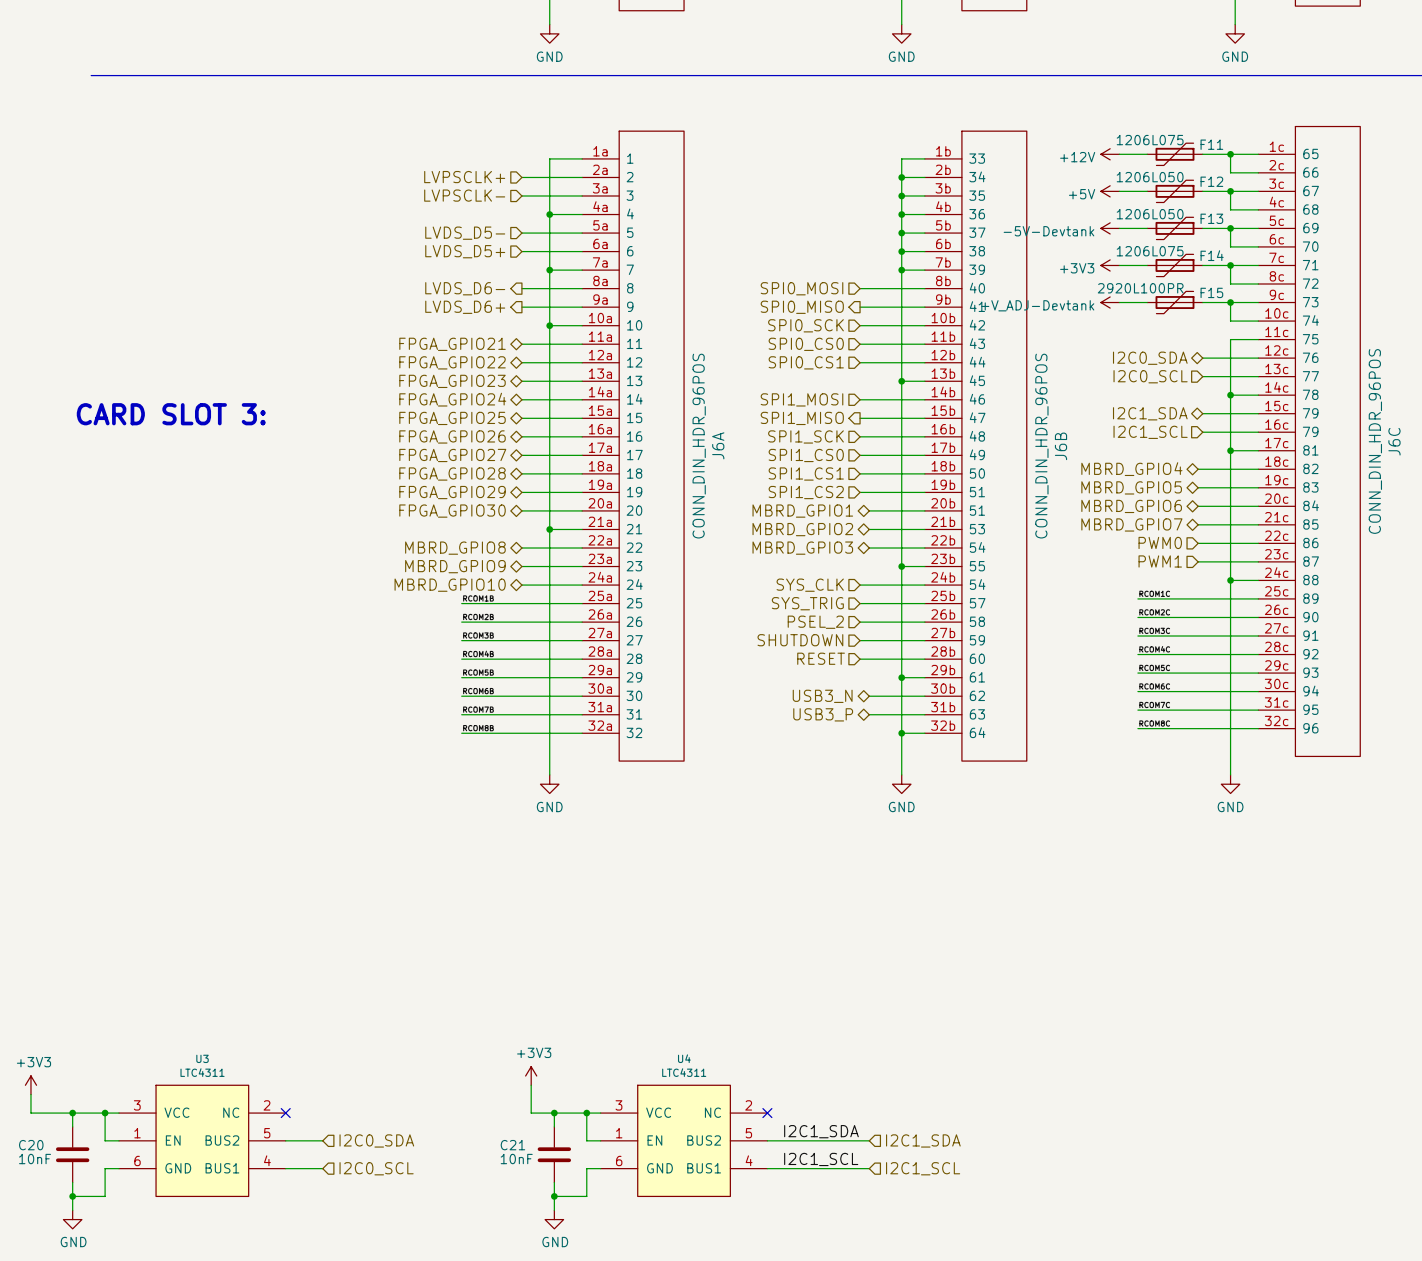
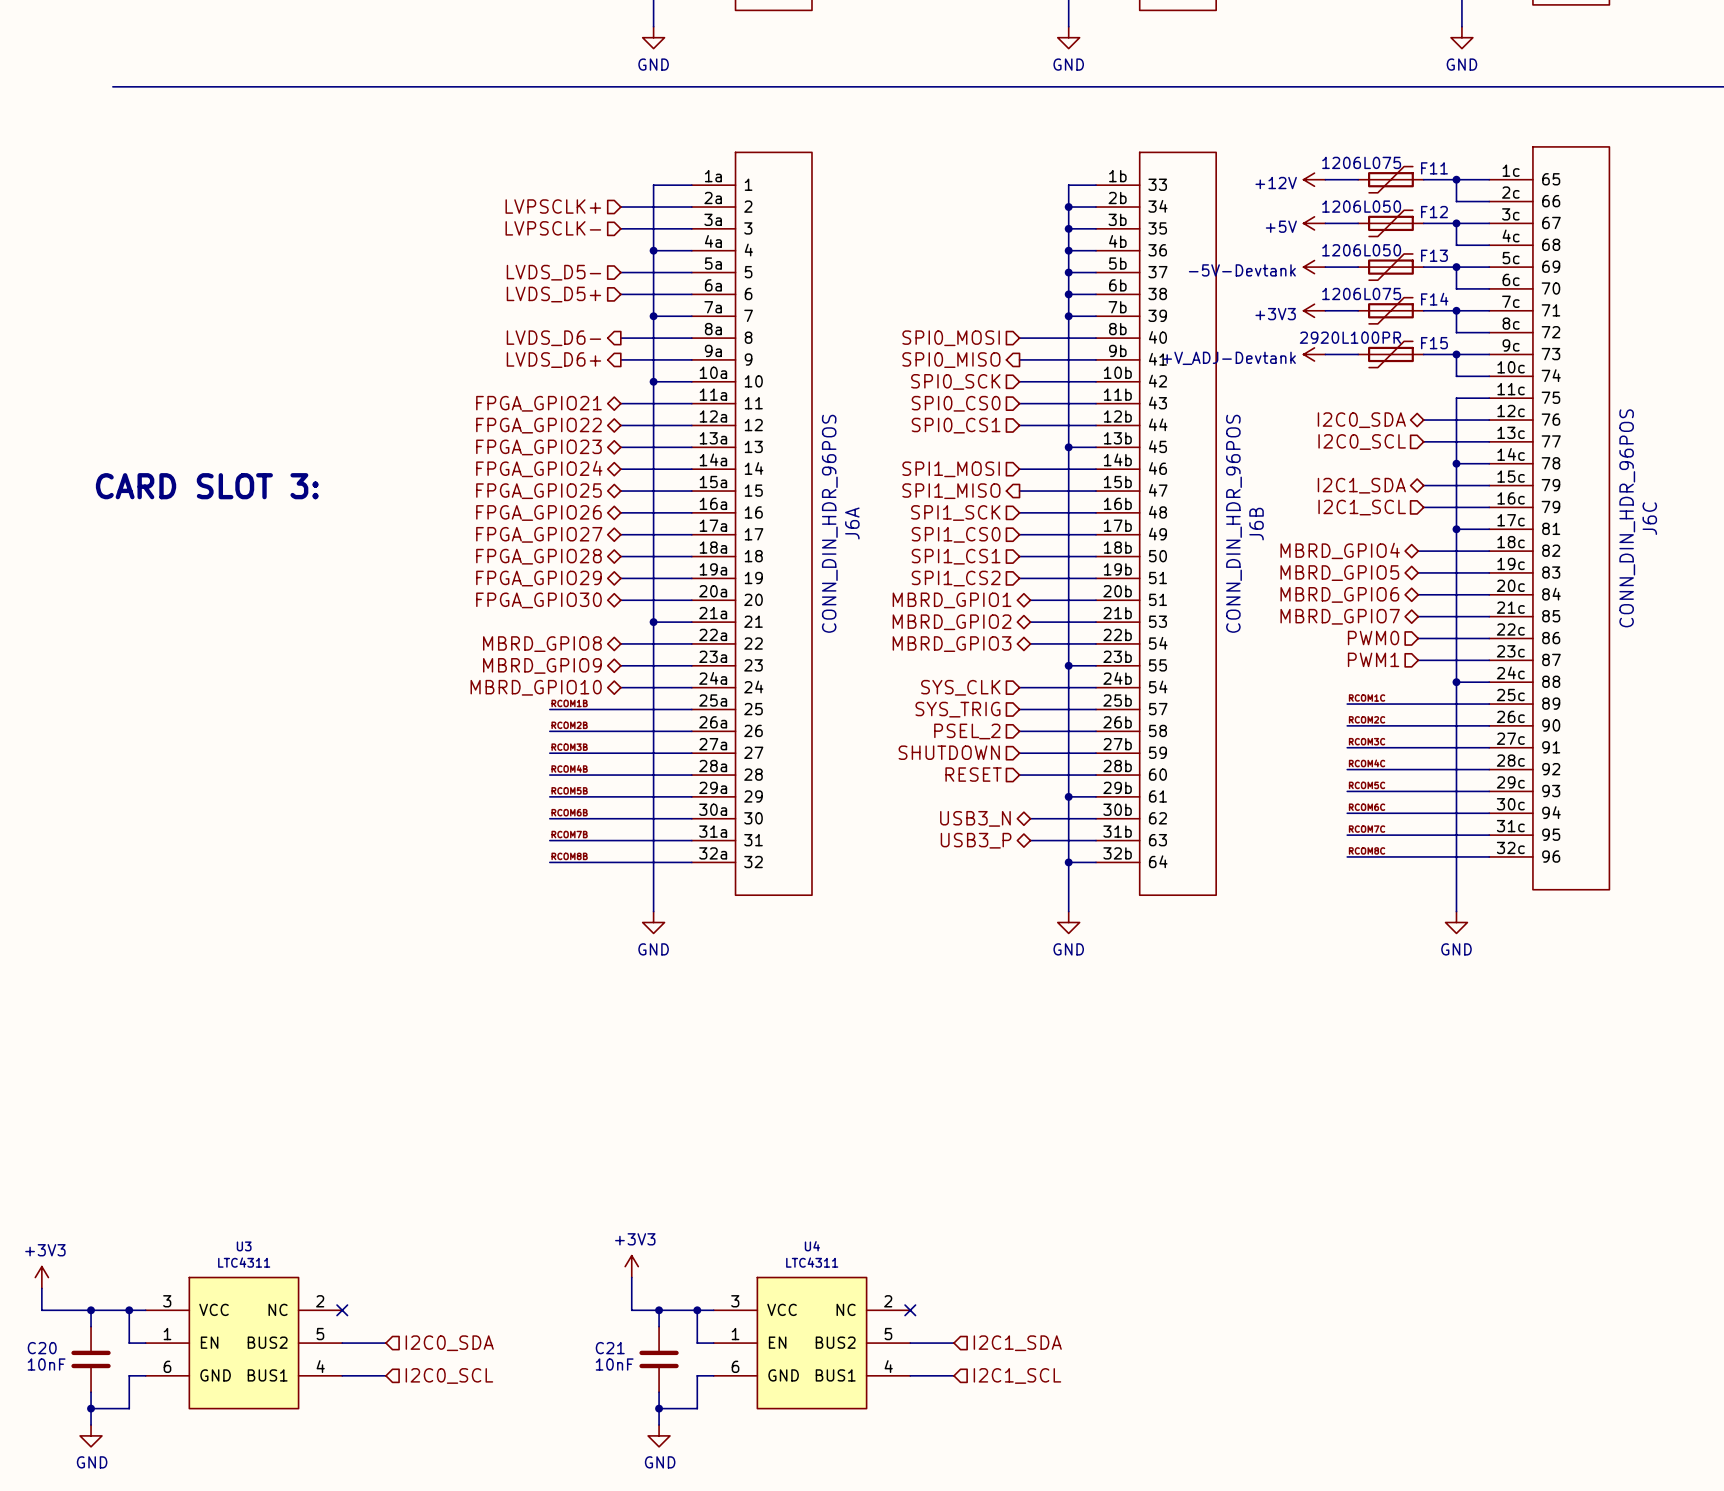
label: I2C1_SDA (821, 1131) -> none
wire: (804, 1140) (869, 1140) -> none
hierarchical label position: I2C1_SDA (923, 1140) -> I2C1_SDA (1017, 1343)
label: I2C1_SCL (821, 1159) -> none
wire: (804, 1168) (869, 1168) -> none
hierarchical label position: I2C1_SCL (923, 1168) -> I2C1_SCL (1017, 1375)

